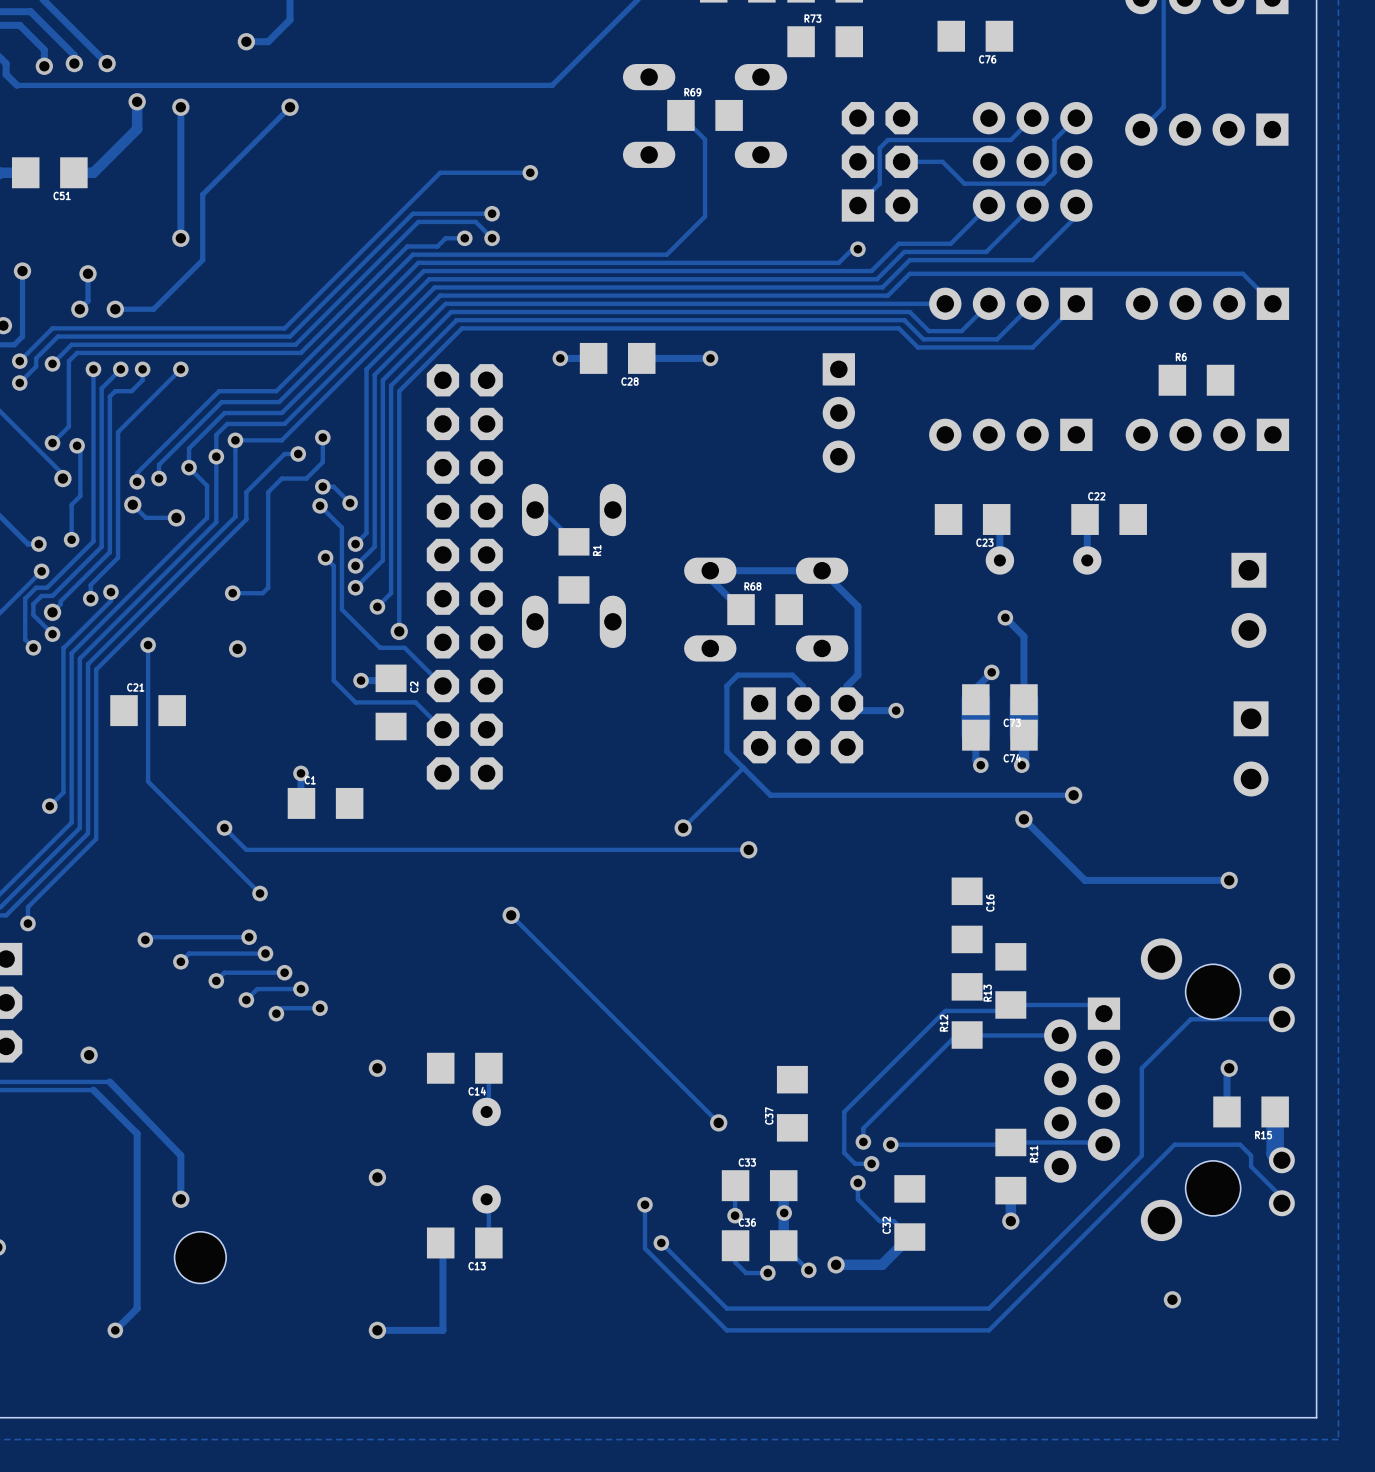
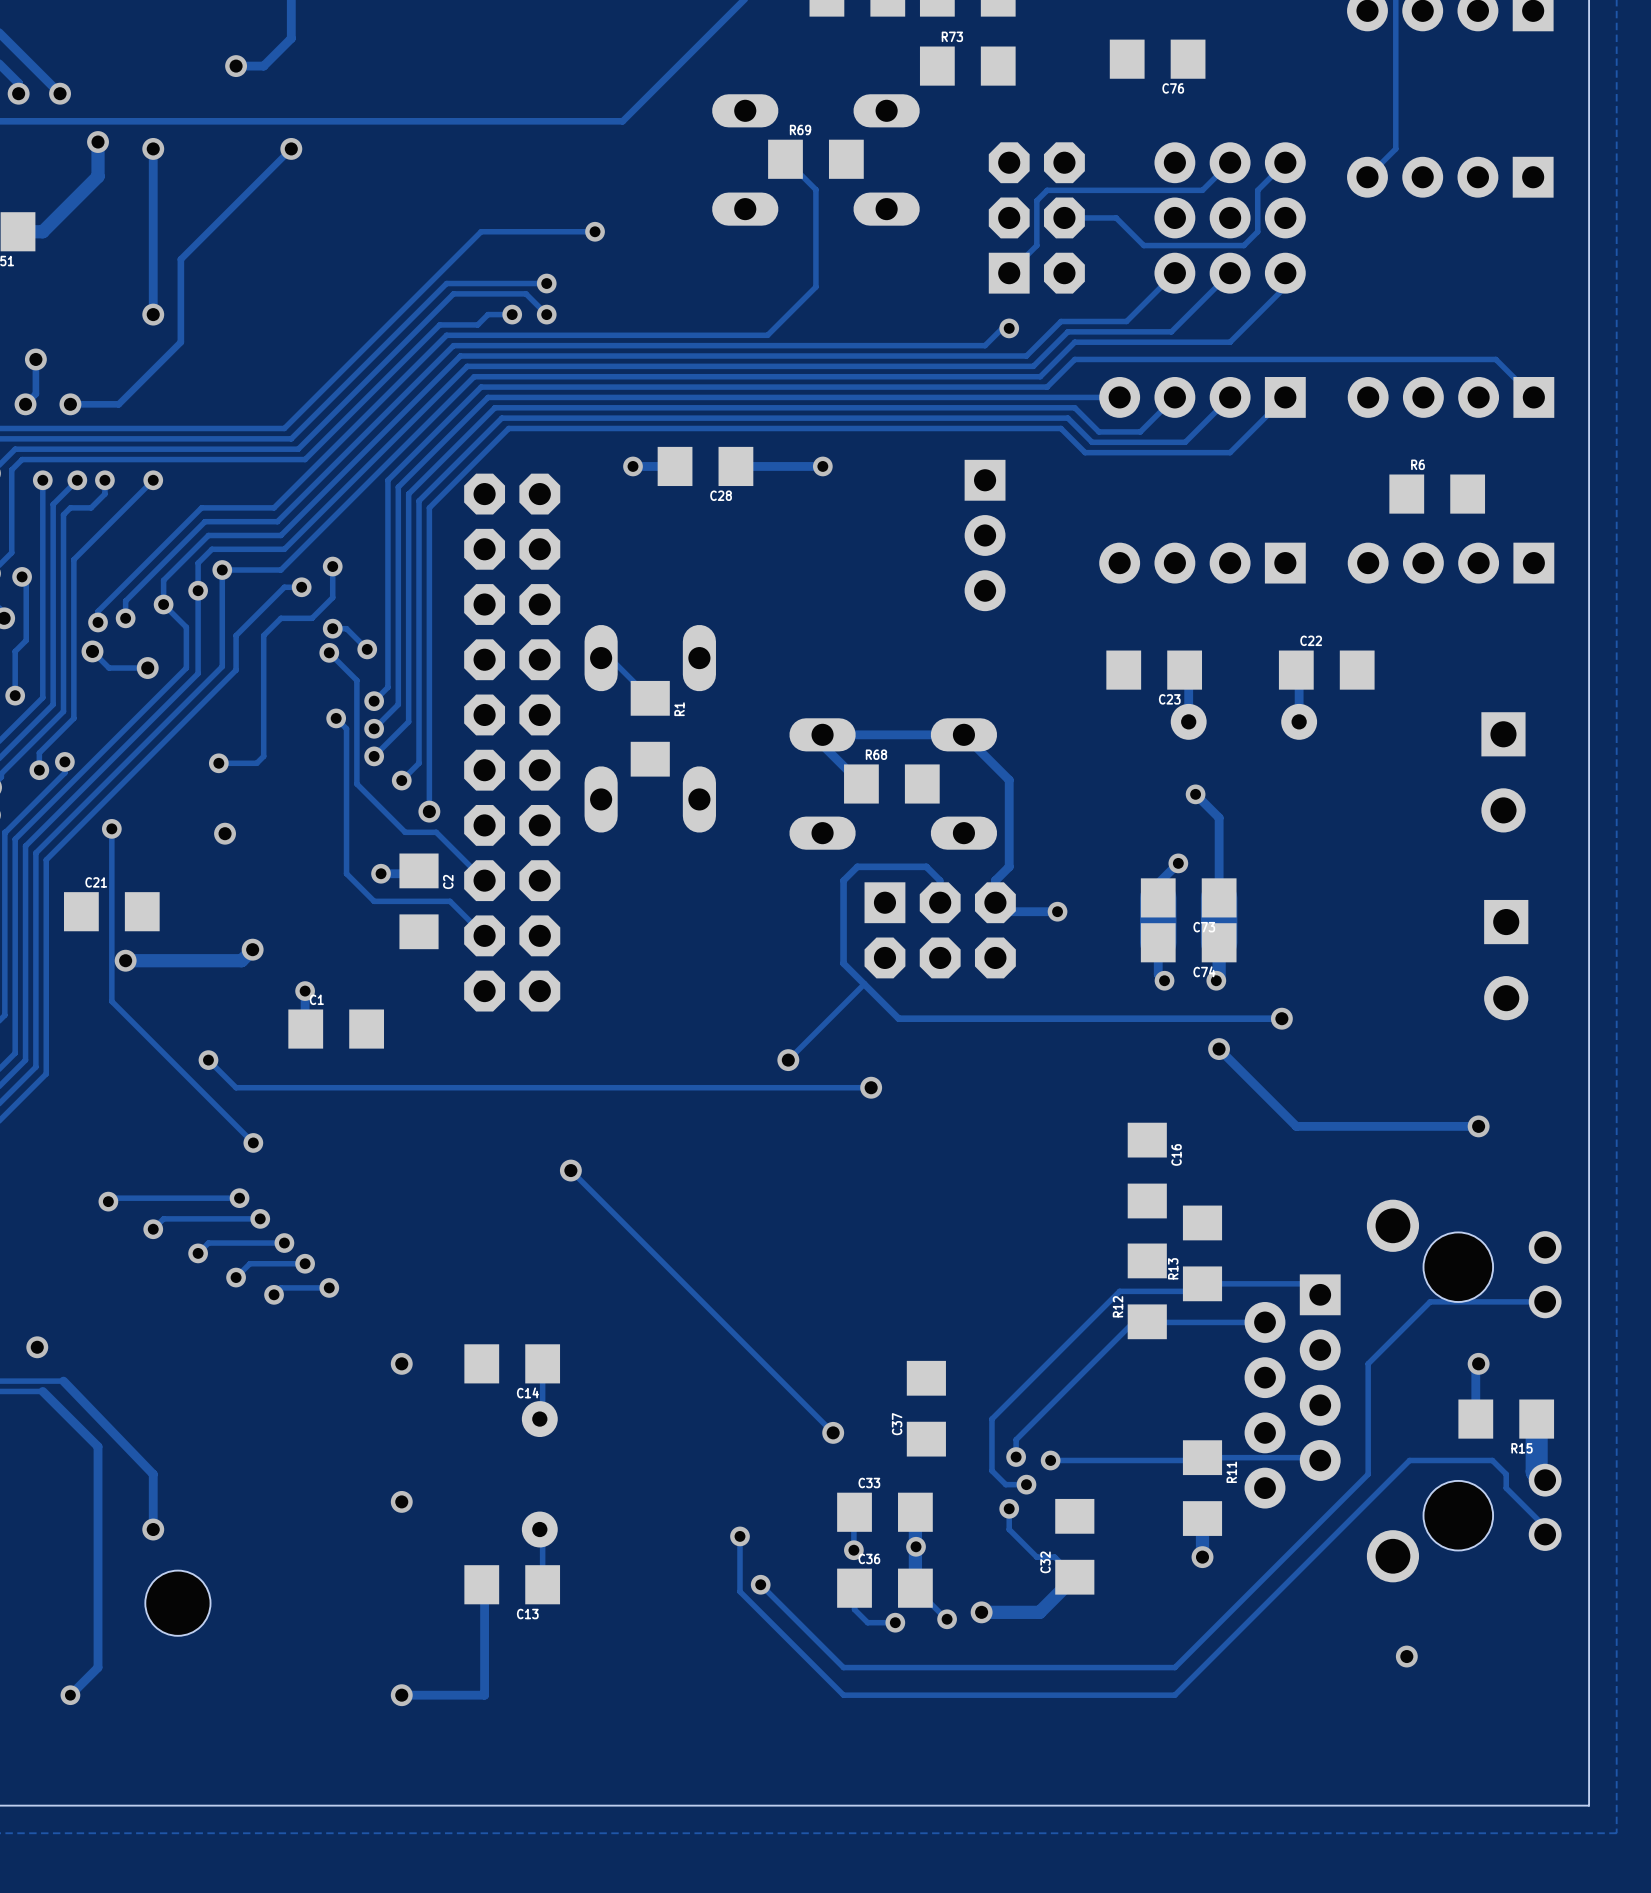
track: none -> (252, 949) (241, 960) (125, 960)
via: none -> (252, 949)
via: none -> (125, 960)

